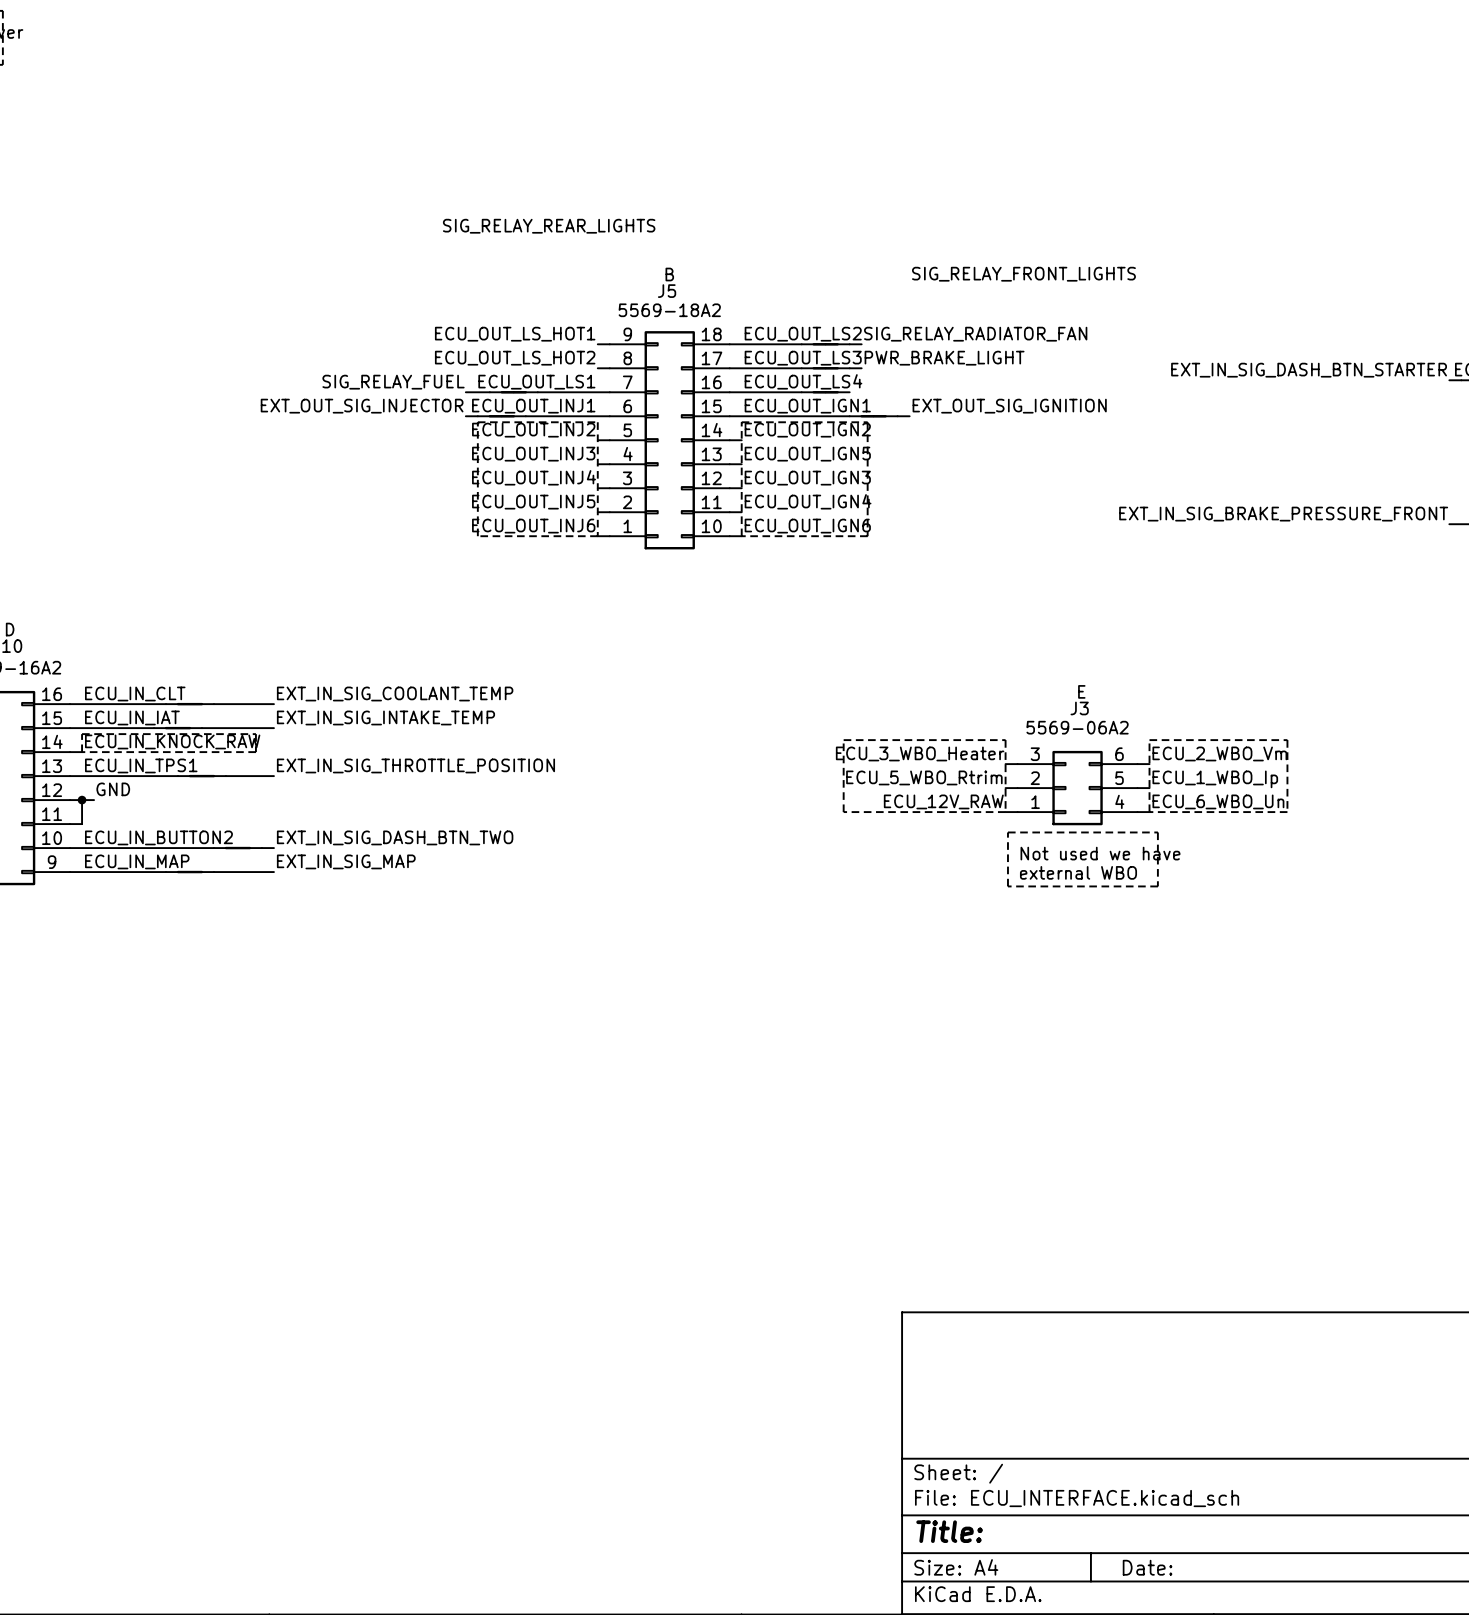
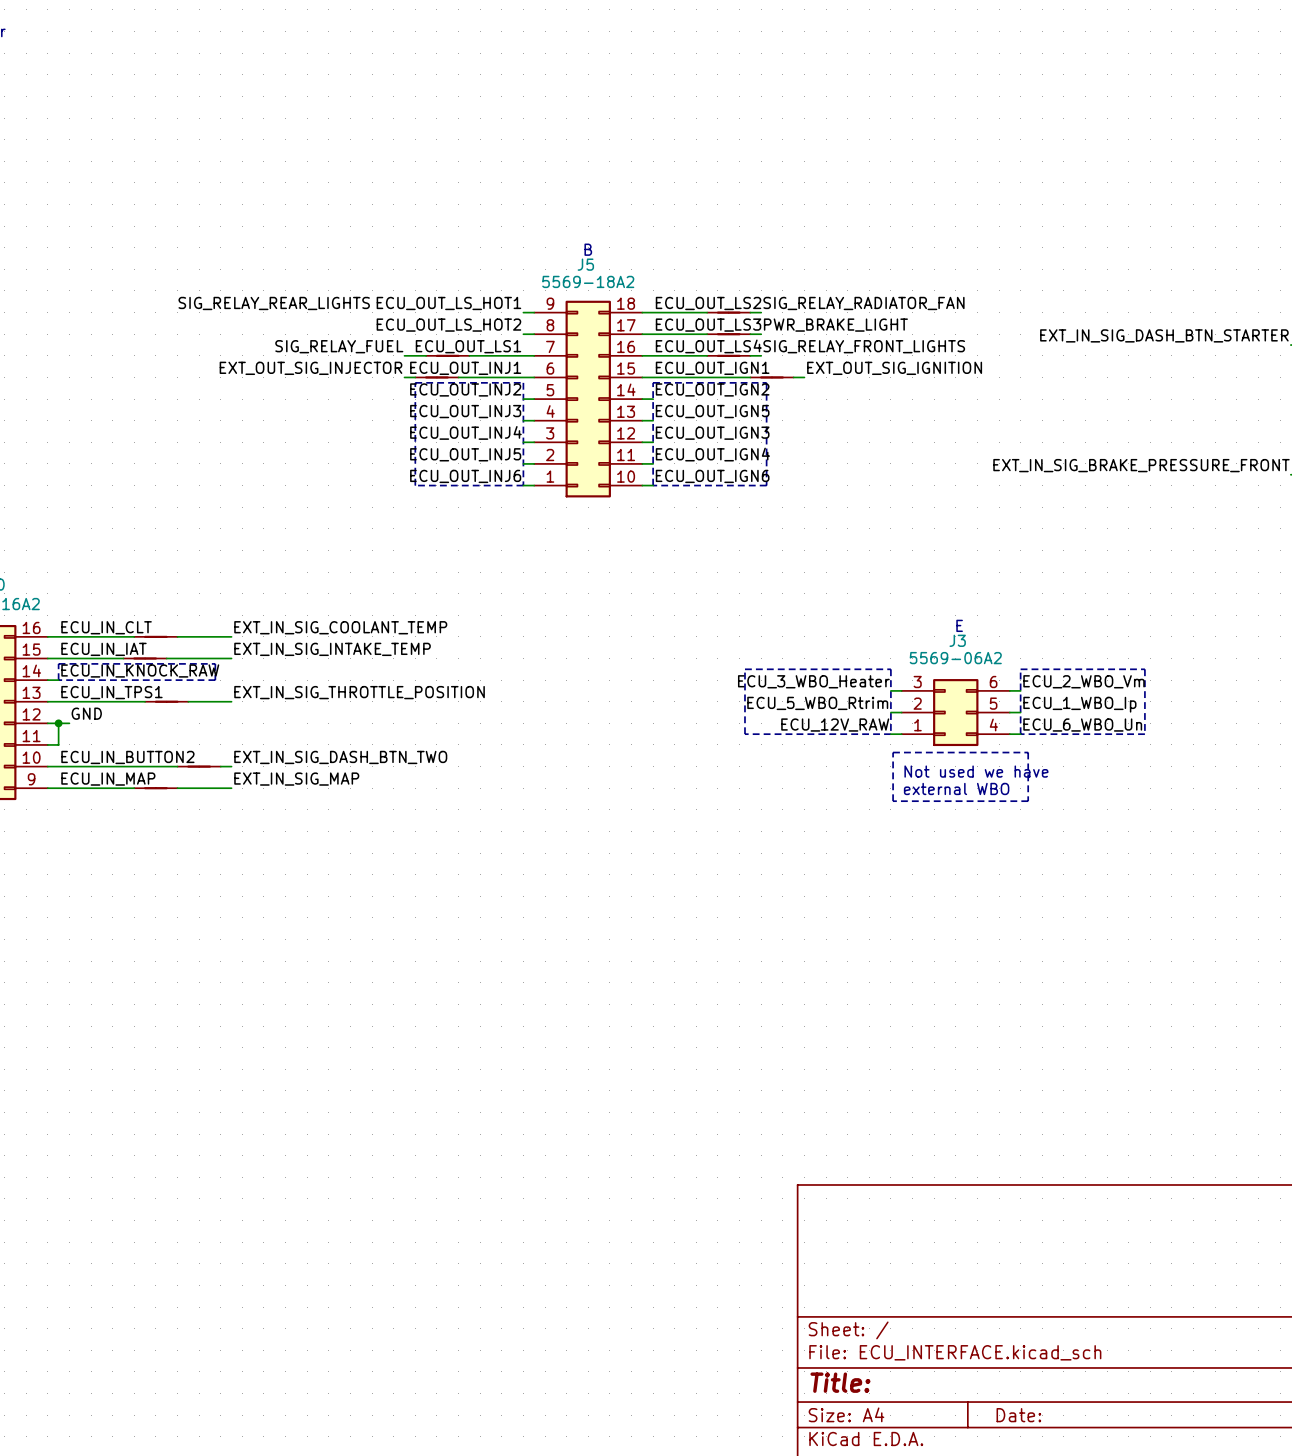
label: SIG_RELAY_REAR_LIGHTS (549, 226) -> none
label position: SIG_RELAY_FRONT_LIGHTS (1023, 274) -> SIG_RELAY_FRONT_LIGHTS (864, 346)
label: none -> SIG_RELAY_REAR_LIGHTS (274, 303)
wire: none -> (750, 355) (761, 355)

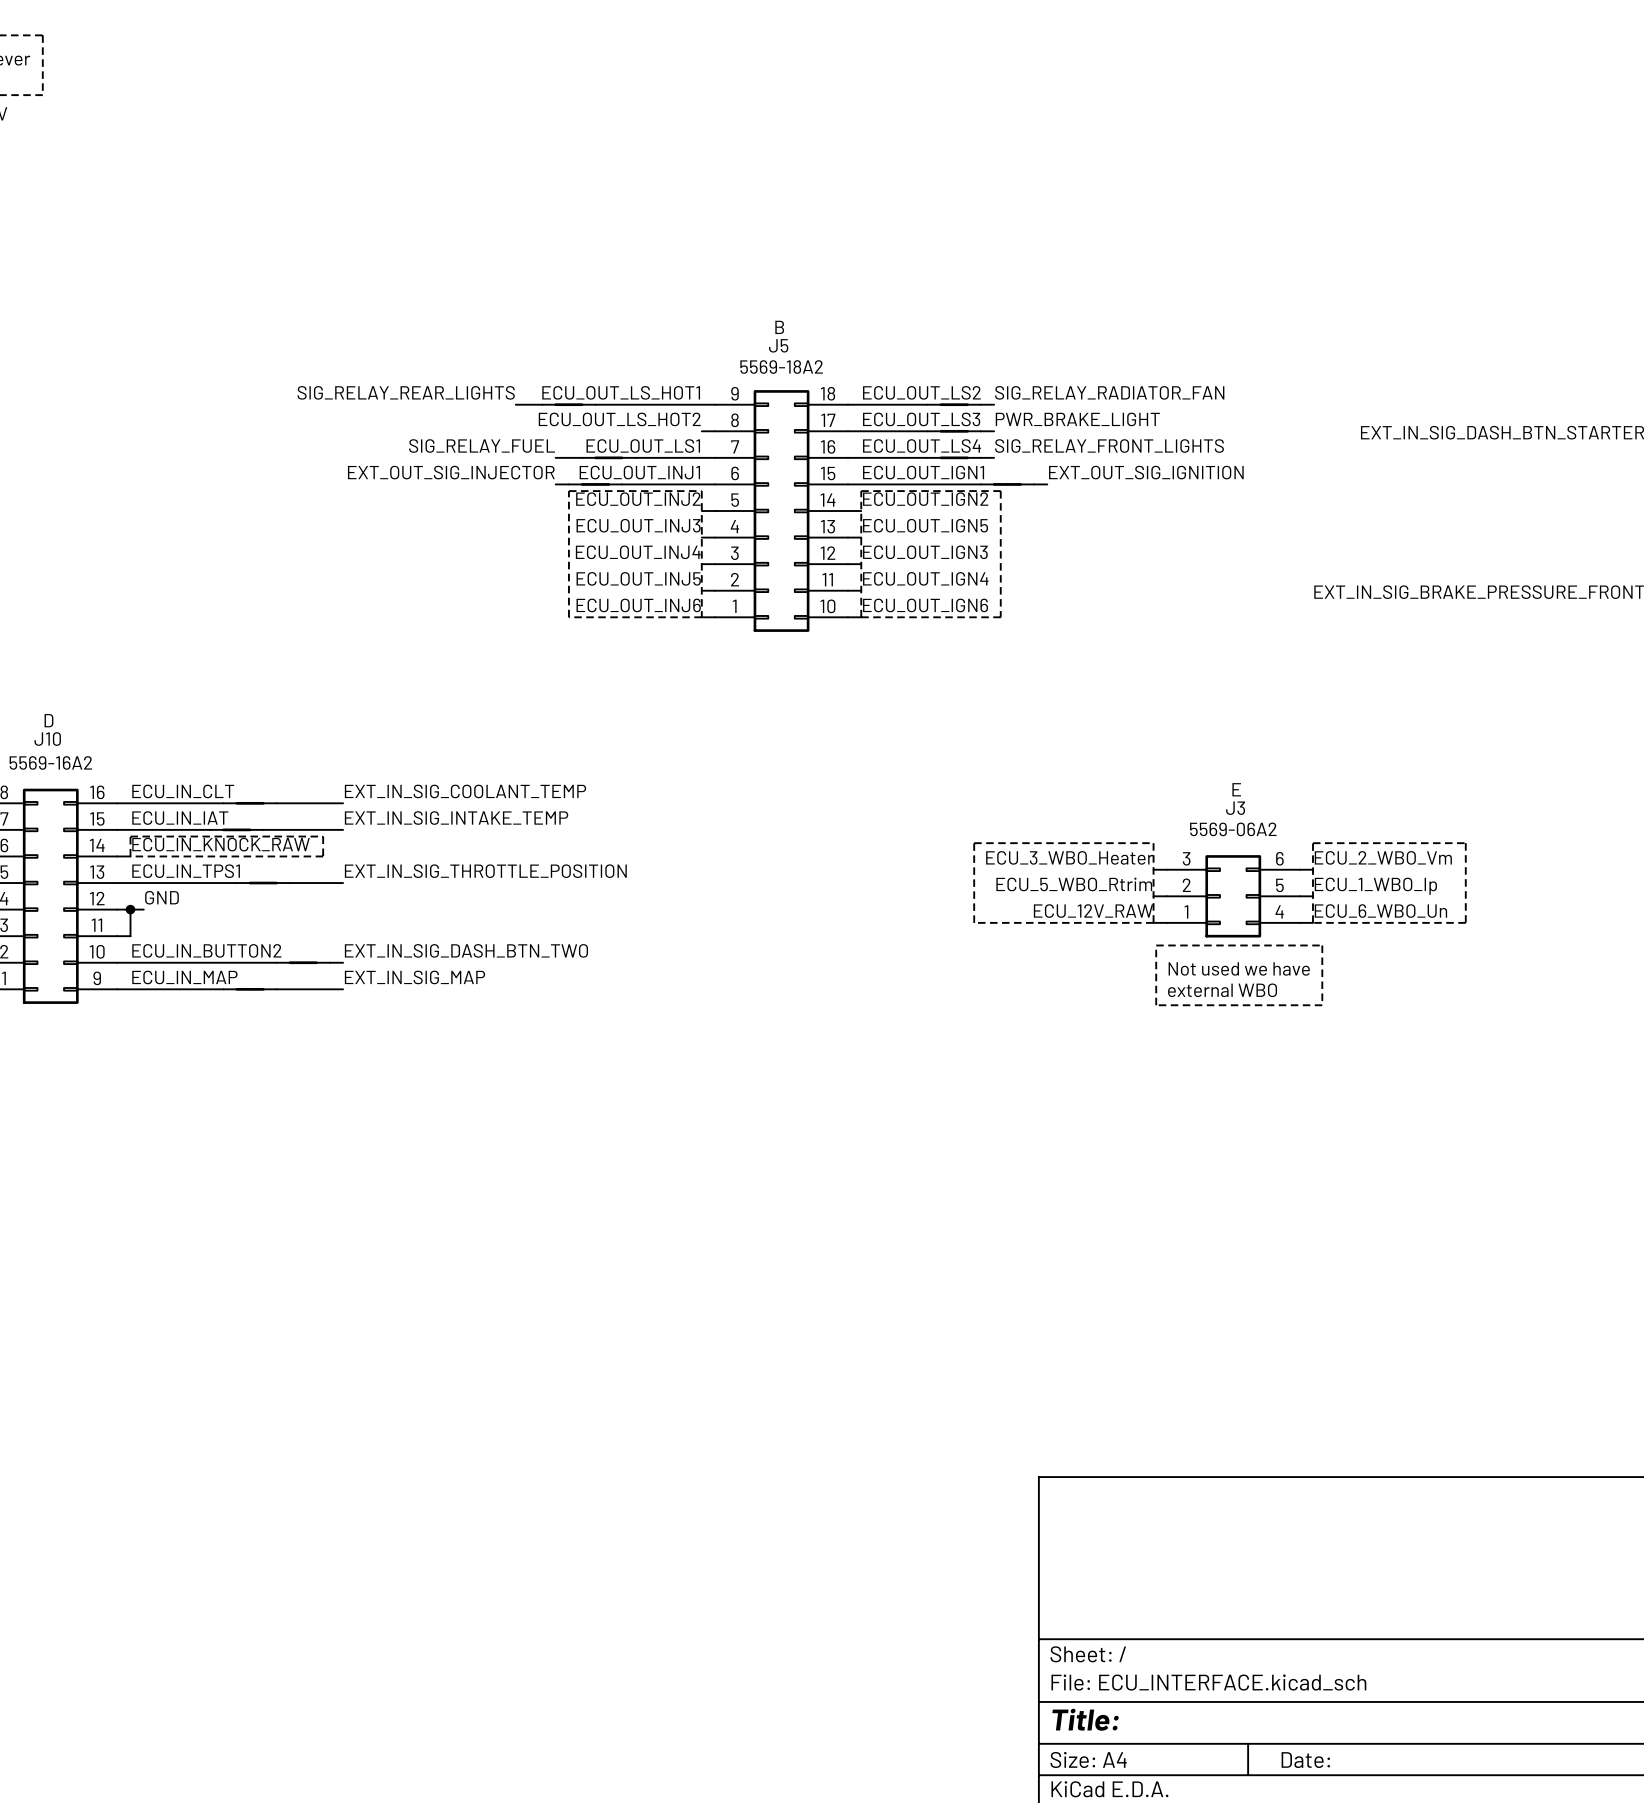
wire: none -> (515, 404) (542, 404)
part: none -> (568, 404)
wire: none -> (595, 404) (701, 404)

